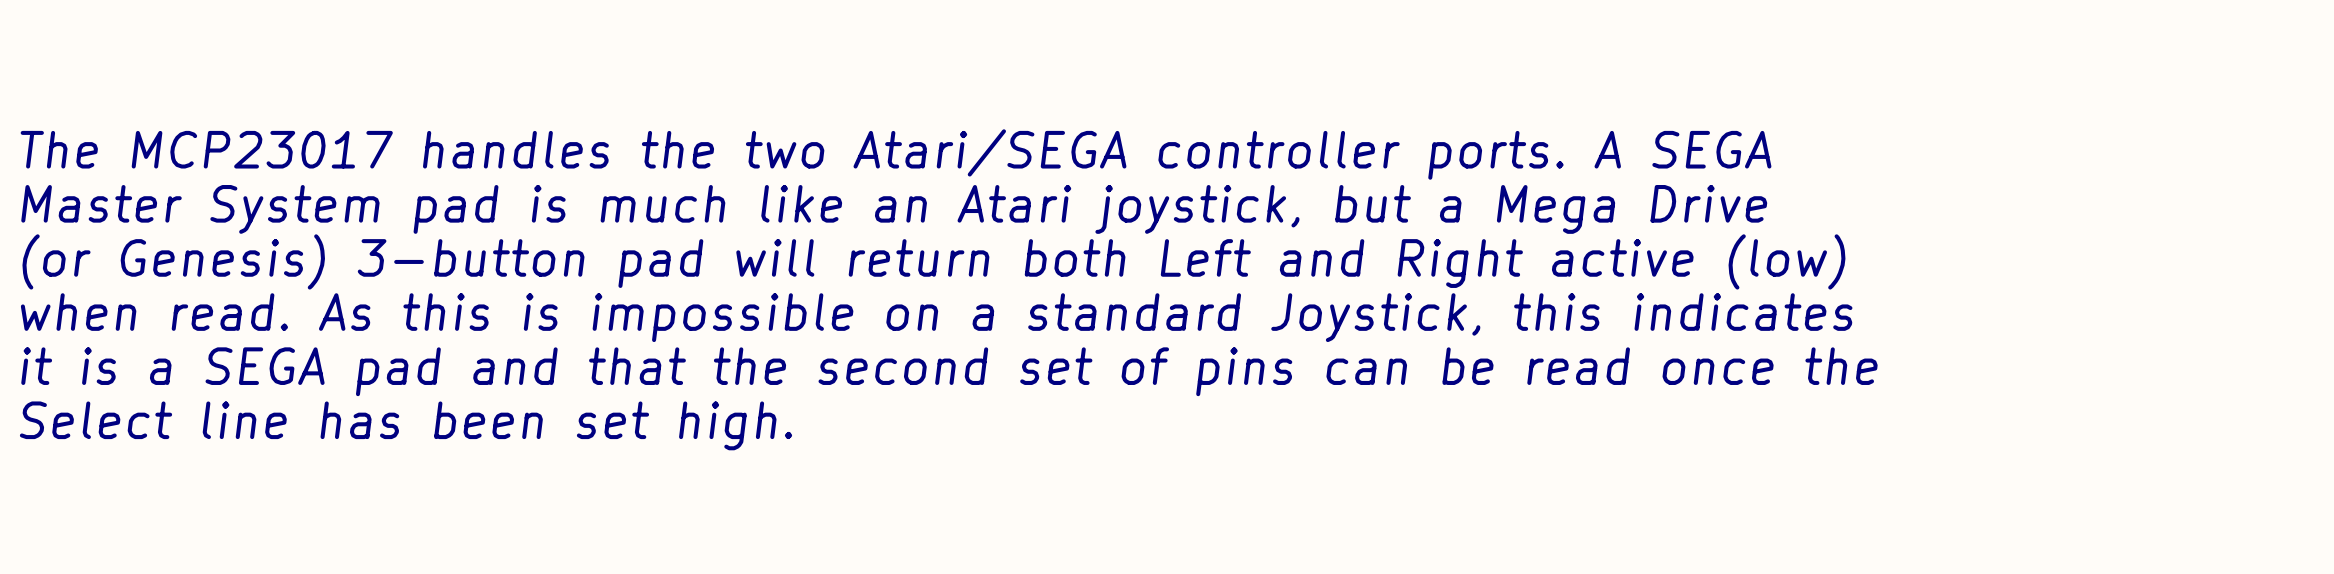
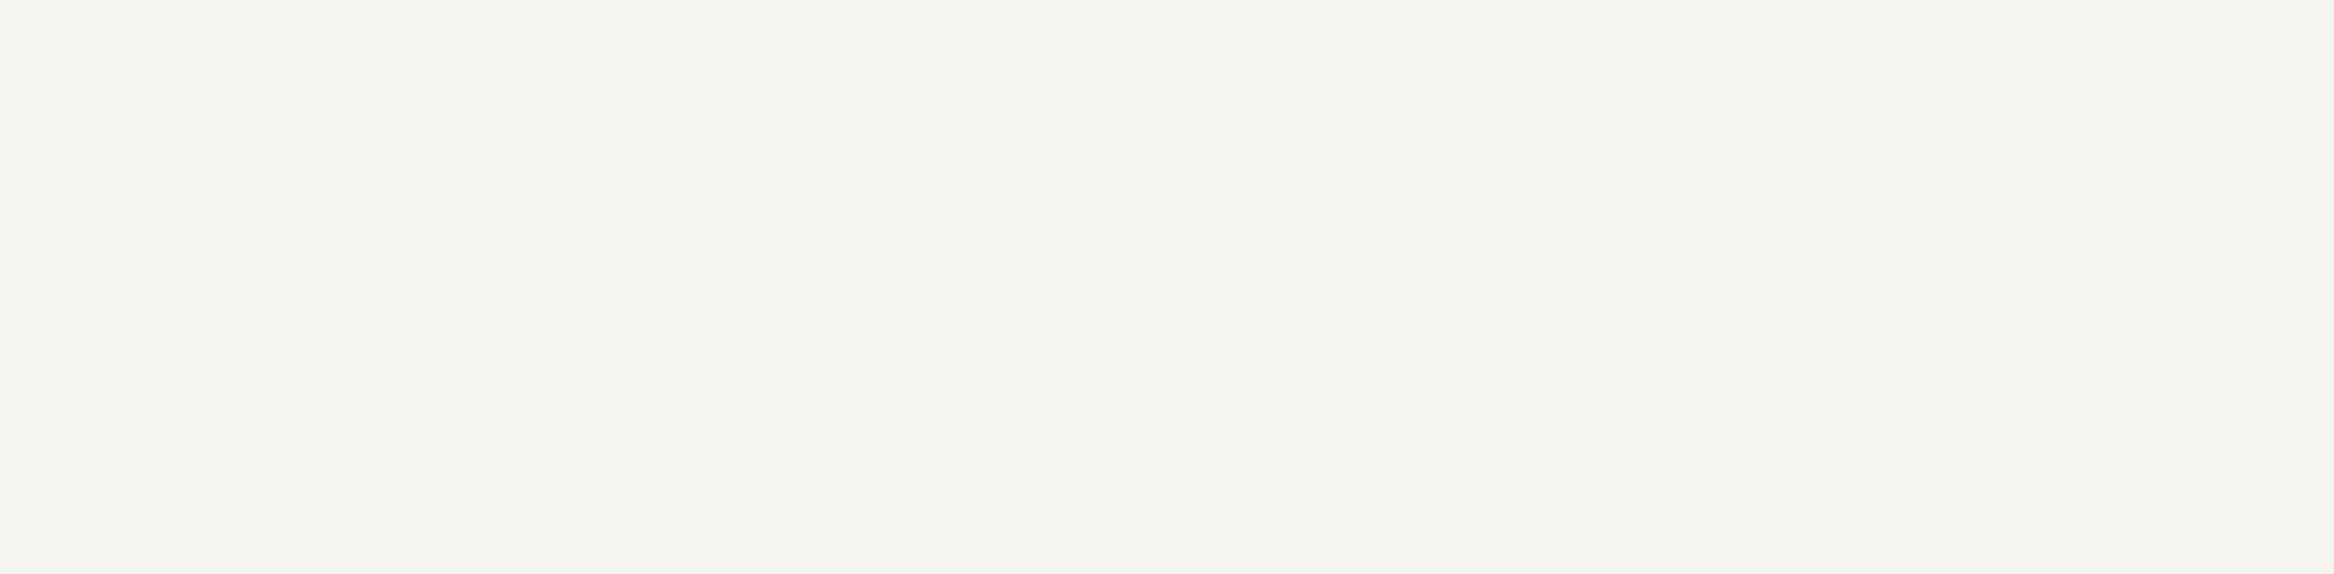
text: The MCP23017 handles the two Atari/SEGA controller ports. A SEGA (896, 154) -> none
text: Master System pad is much like an Atari joystick, but a Mega Drive (894, 209) -> none
text: (or Genesis) 3-button pad will return both Left and Right active (low) (933, 261) -> none
text: when read. As this is impossible on a standard Joystick, this indicates (936, 317) -> none
text: it is a SEGA pad and that the second set of pins can be read once the (949, 371) -> none
text: Select line has been set high. (406, 425) -> none

